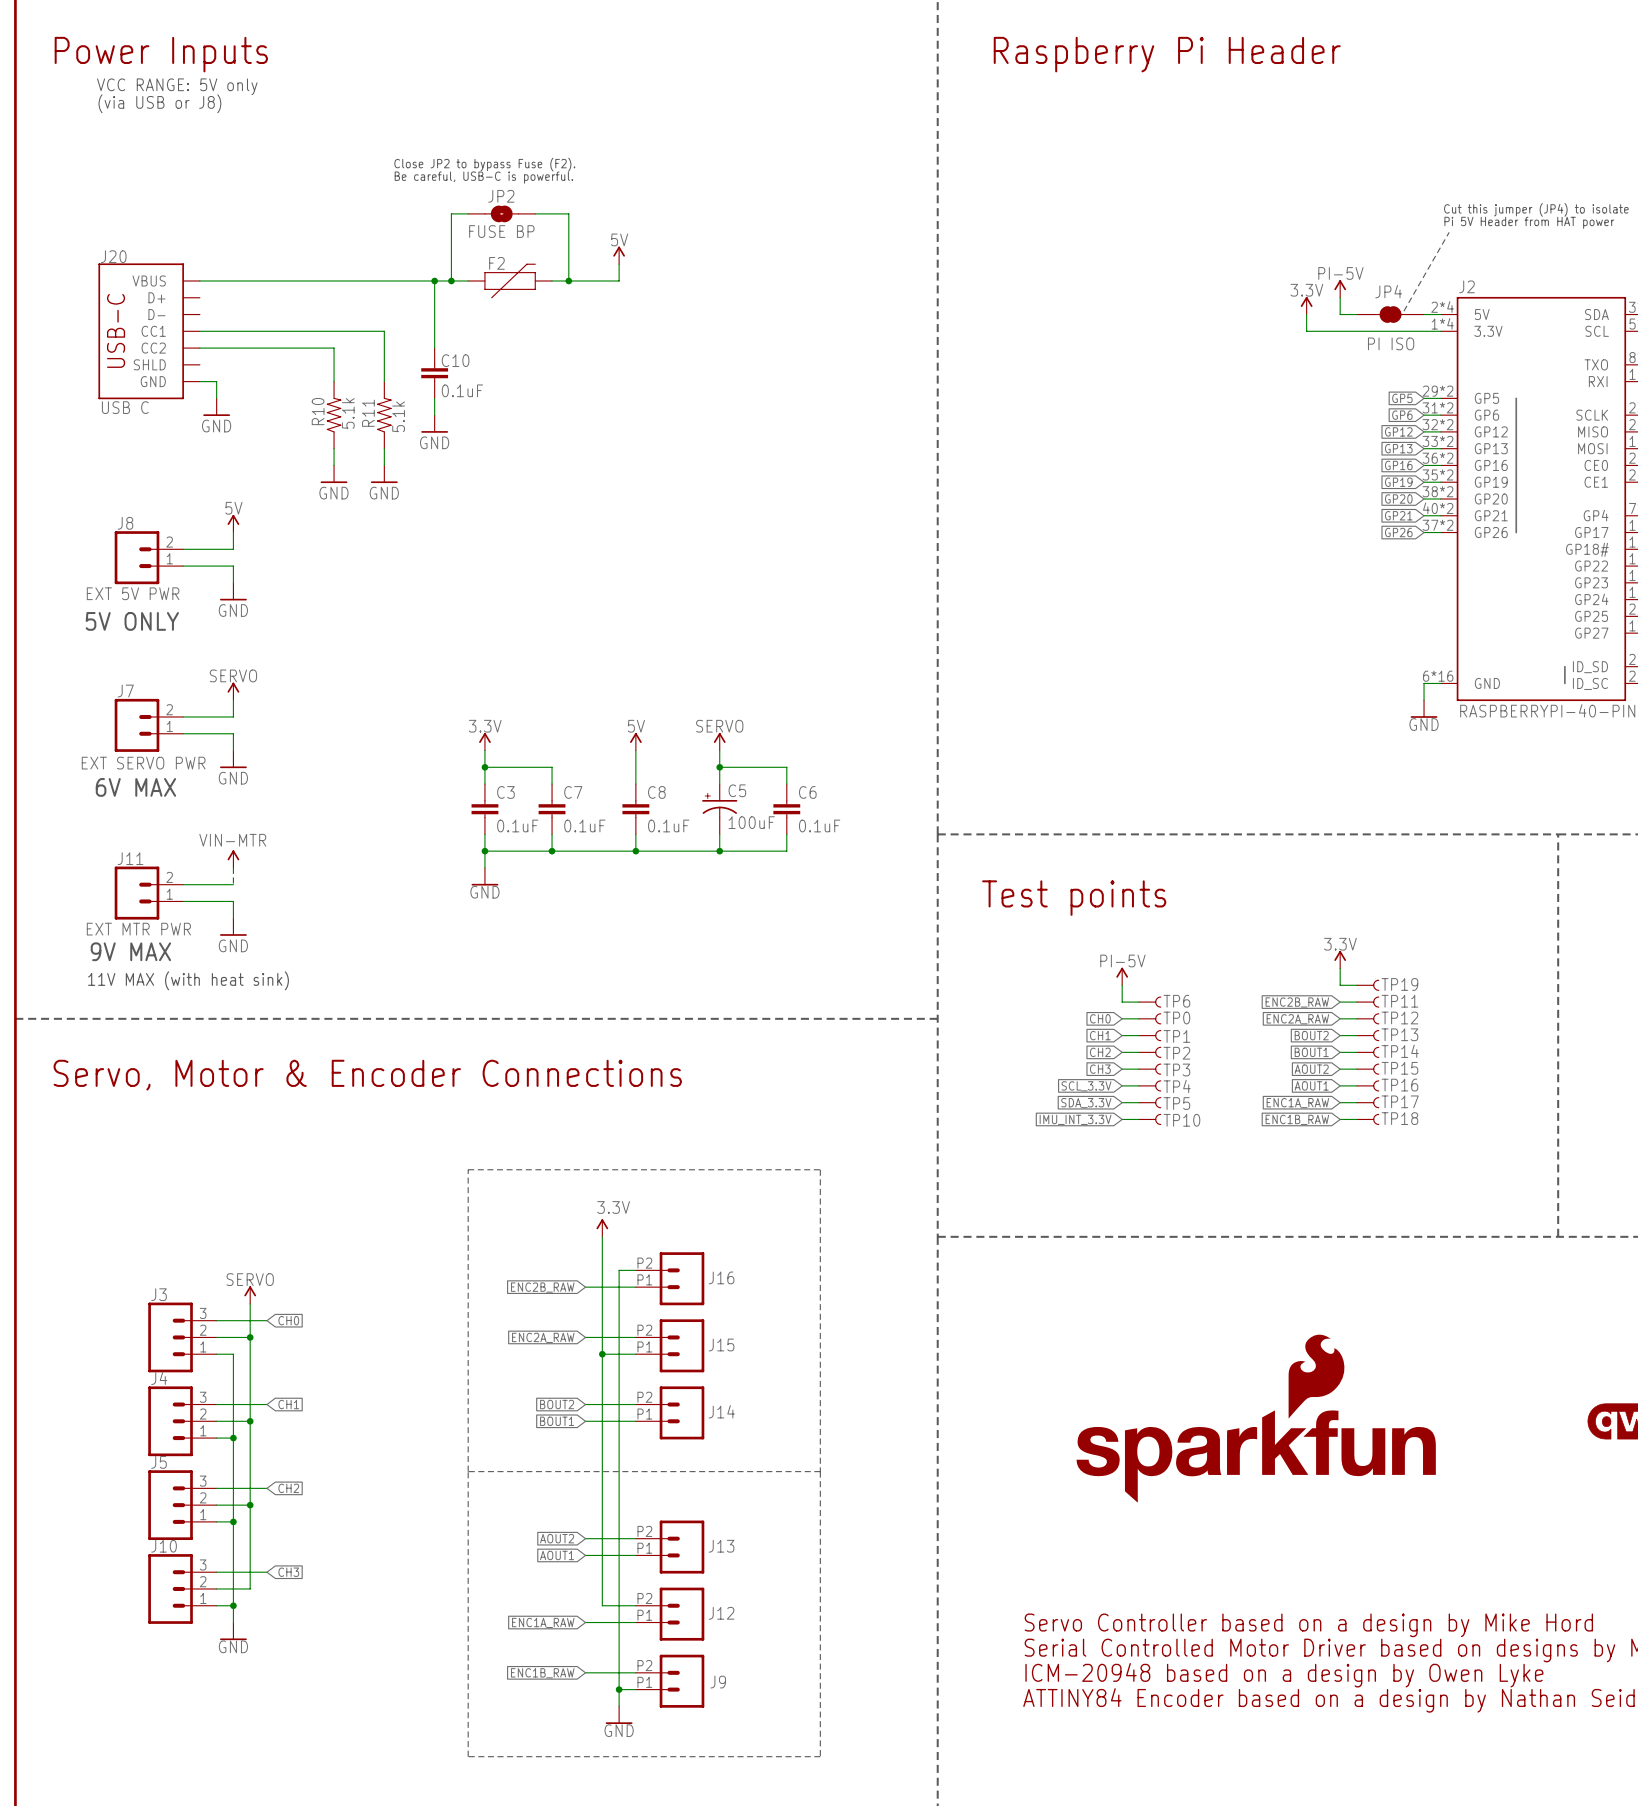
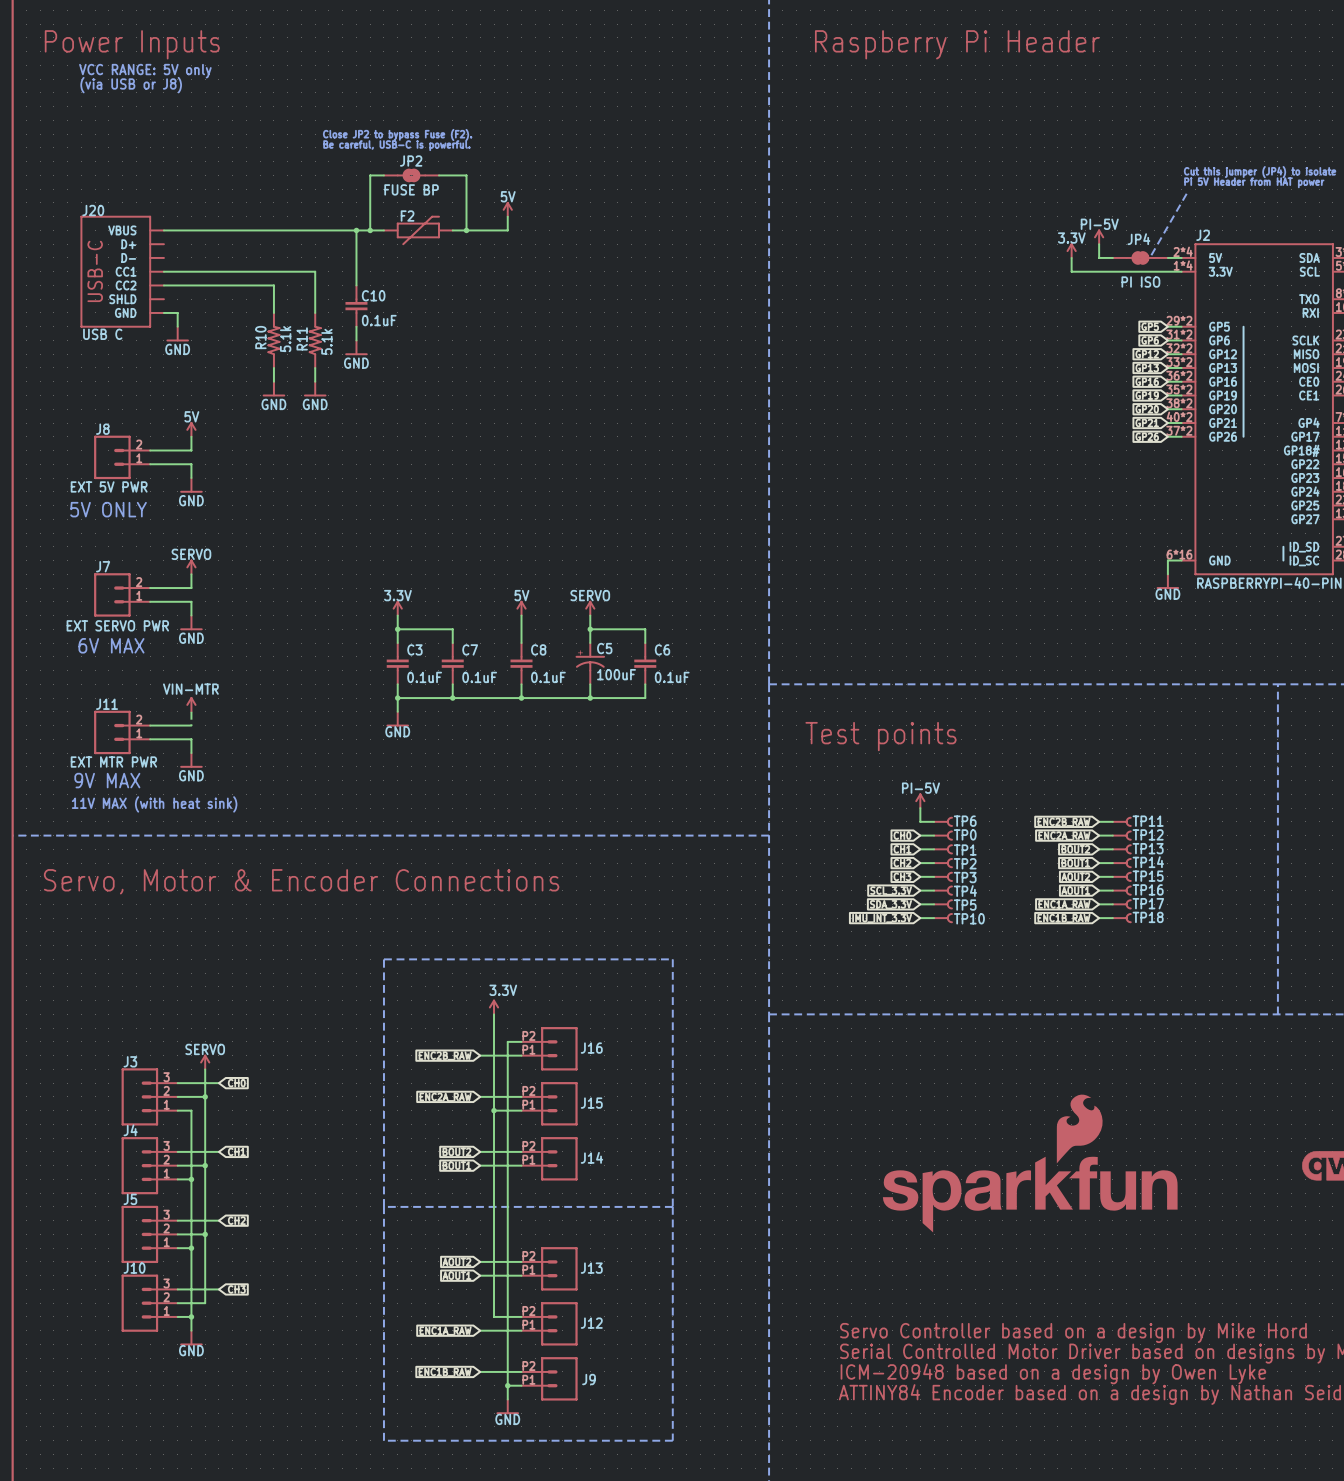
power symbol: 3.3V (1340, 959) -> none
wire: (1340, 968) (1340, 985) (1356, 985) -> none
TP19: (1367, 985) -> none

